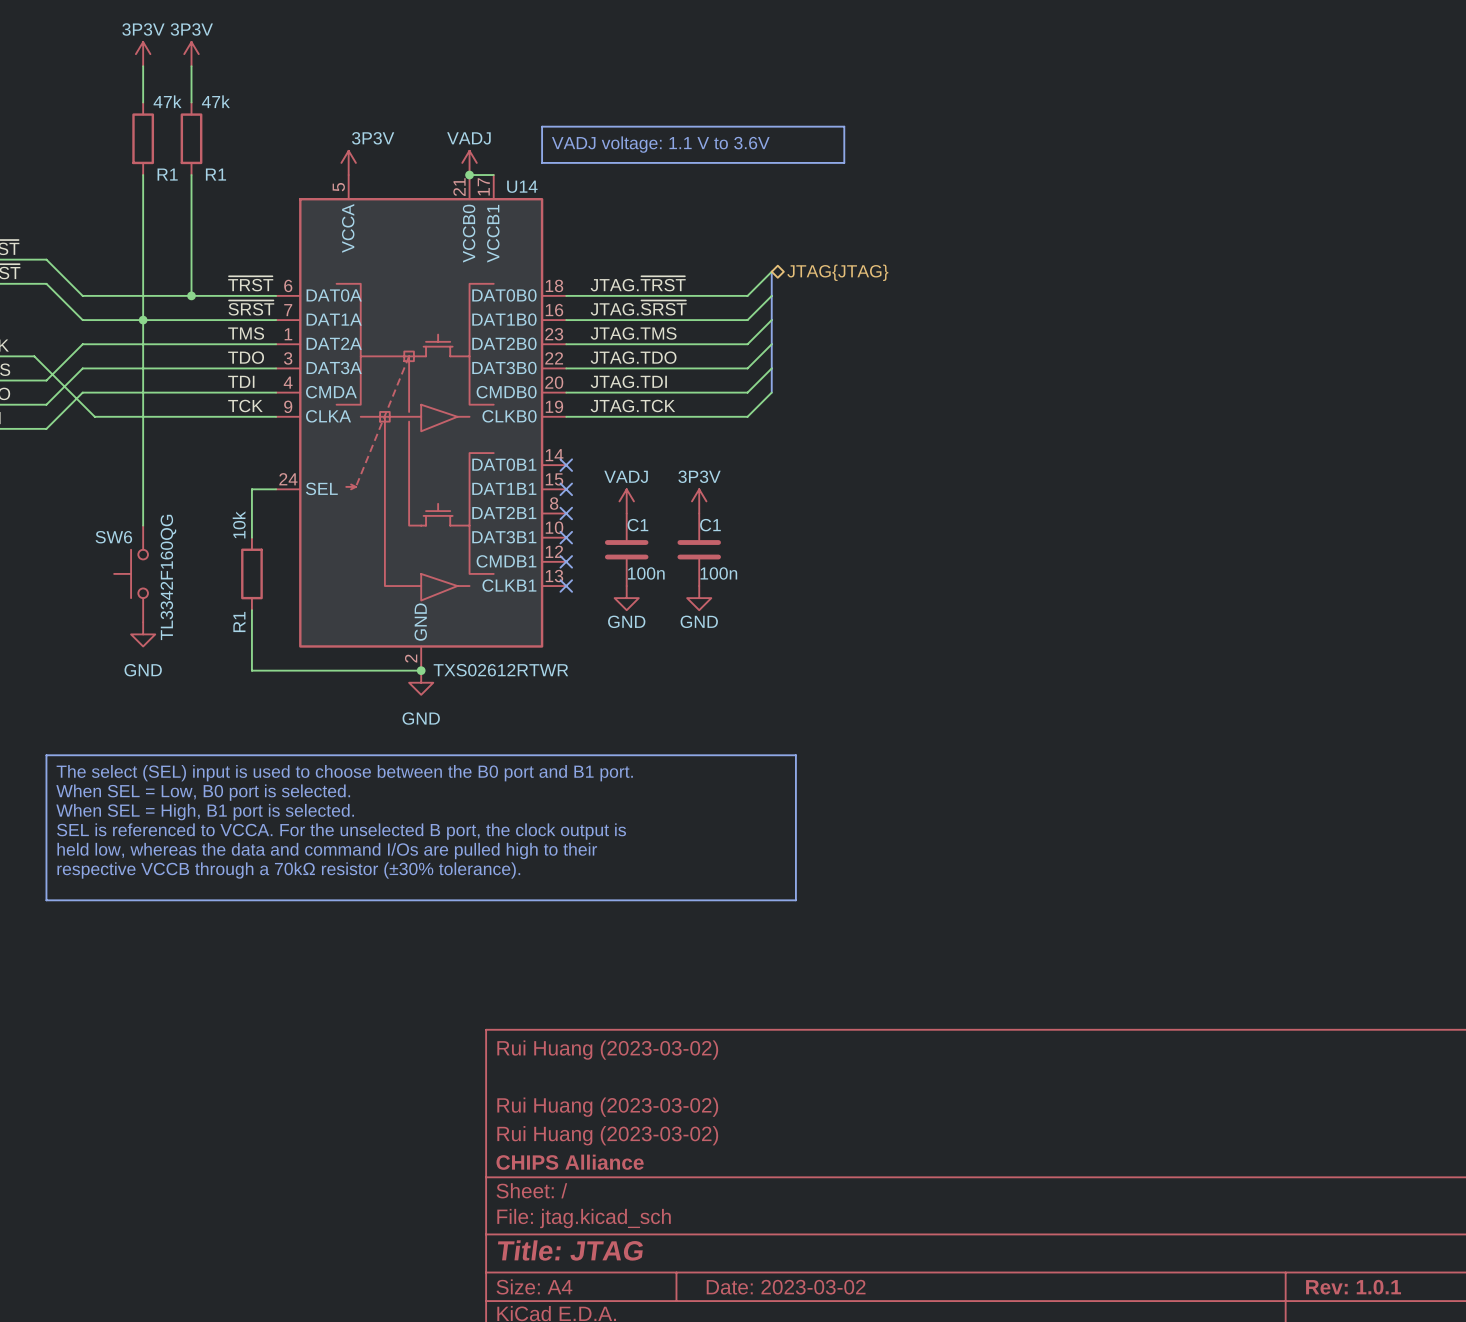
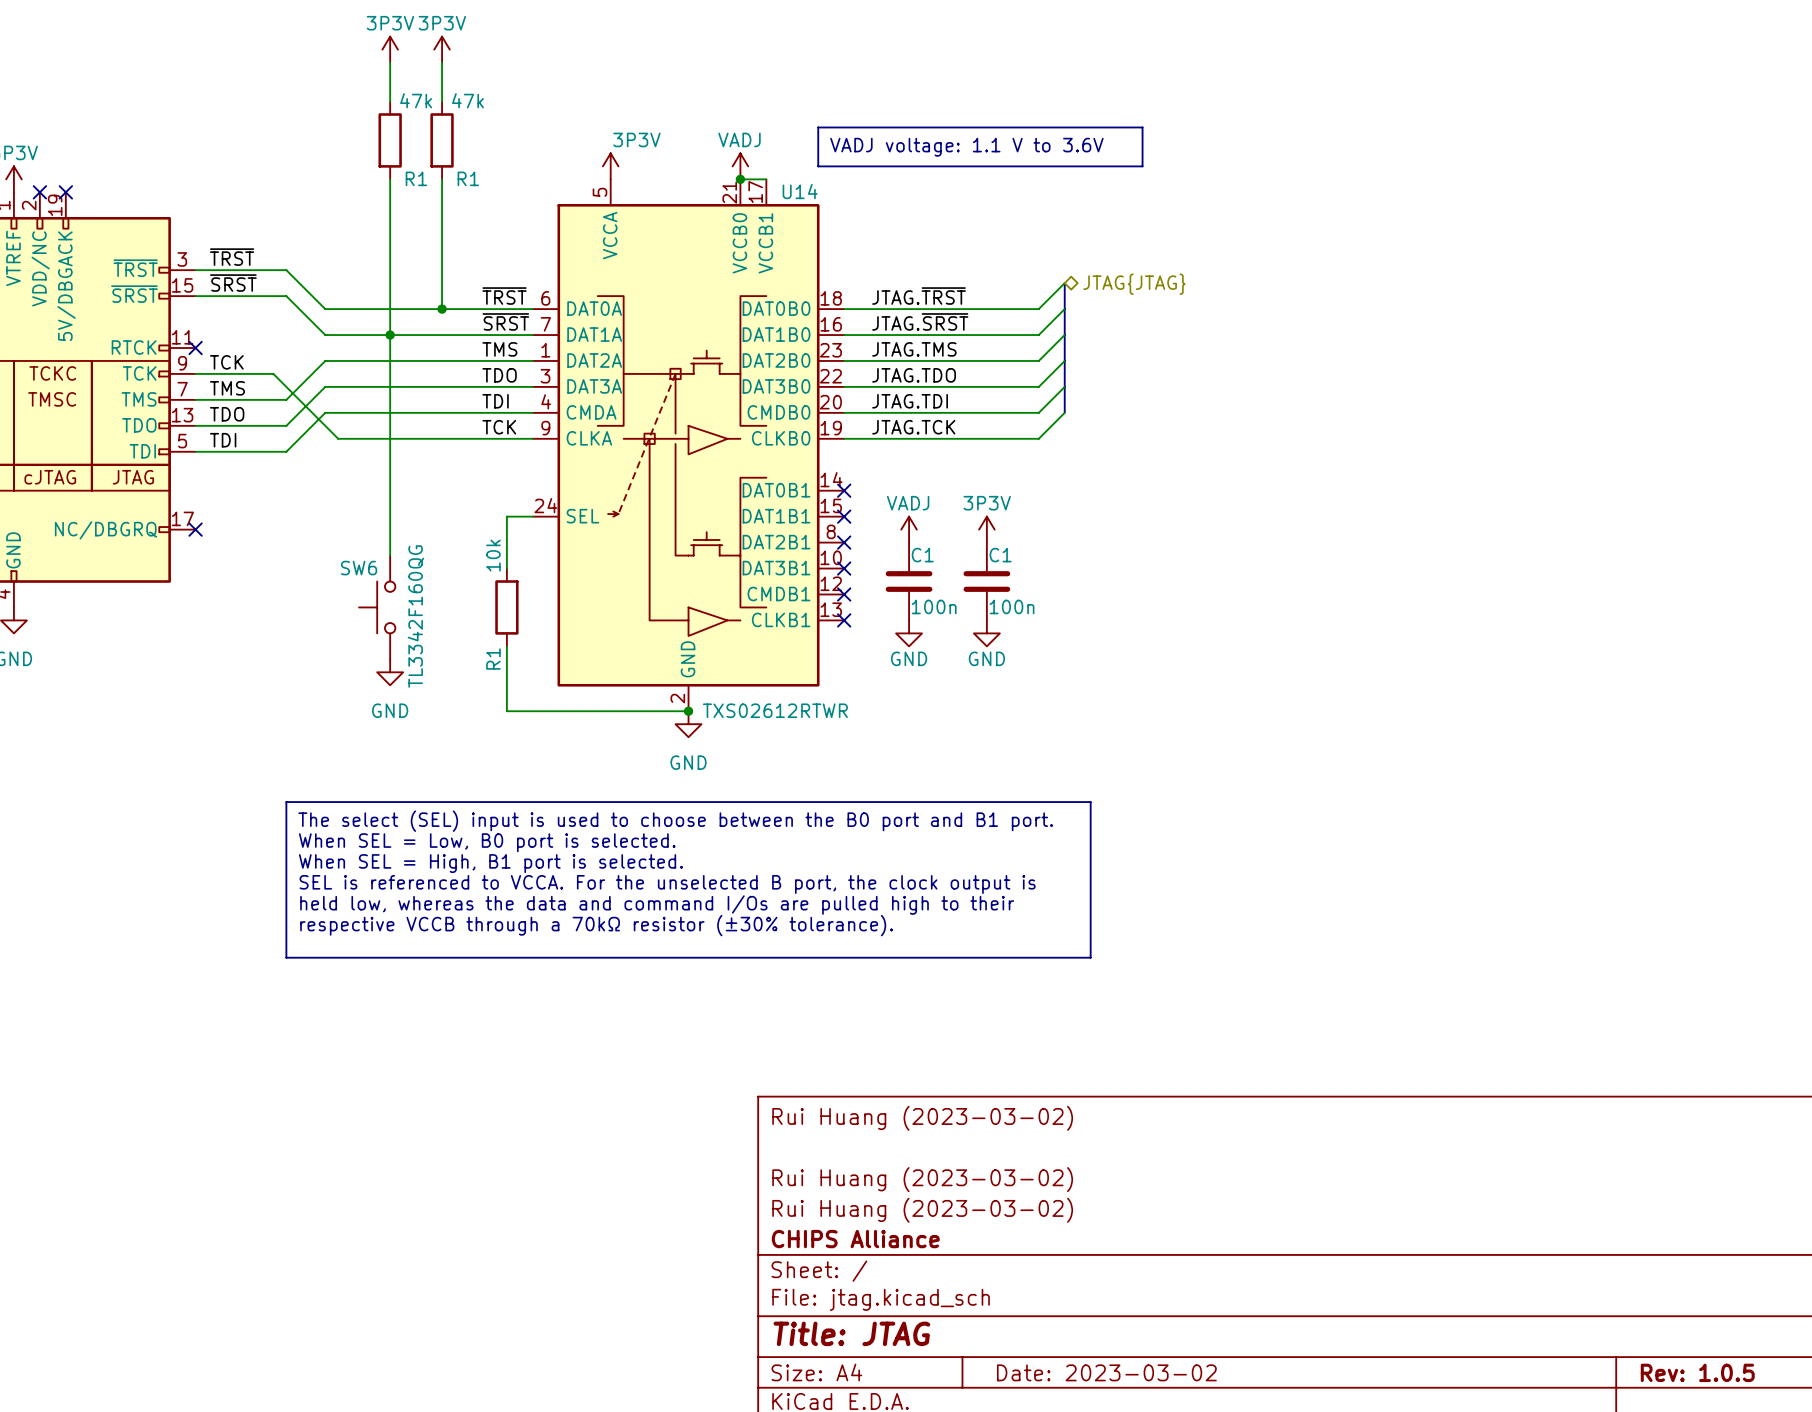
title block: Rev: 1.0.1 (1353, 1287) -> Rev: 1.0.5 (1697, 1372)

